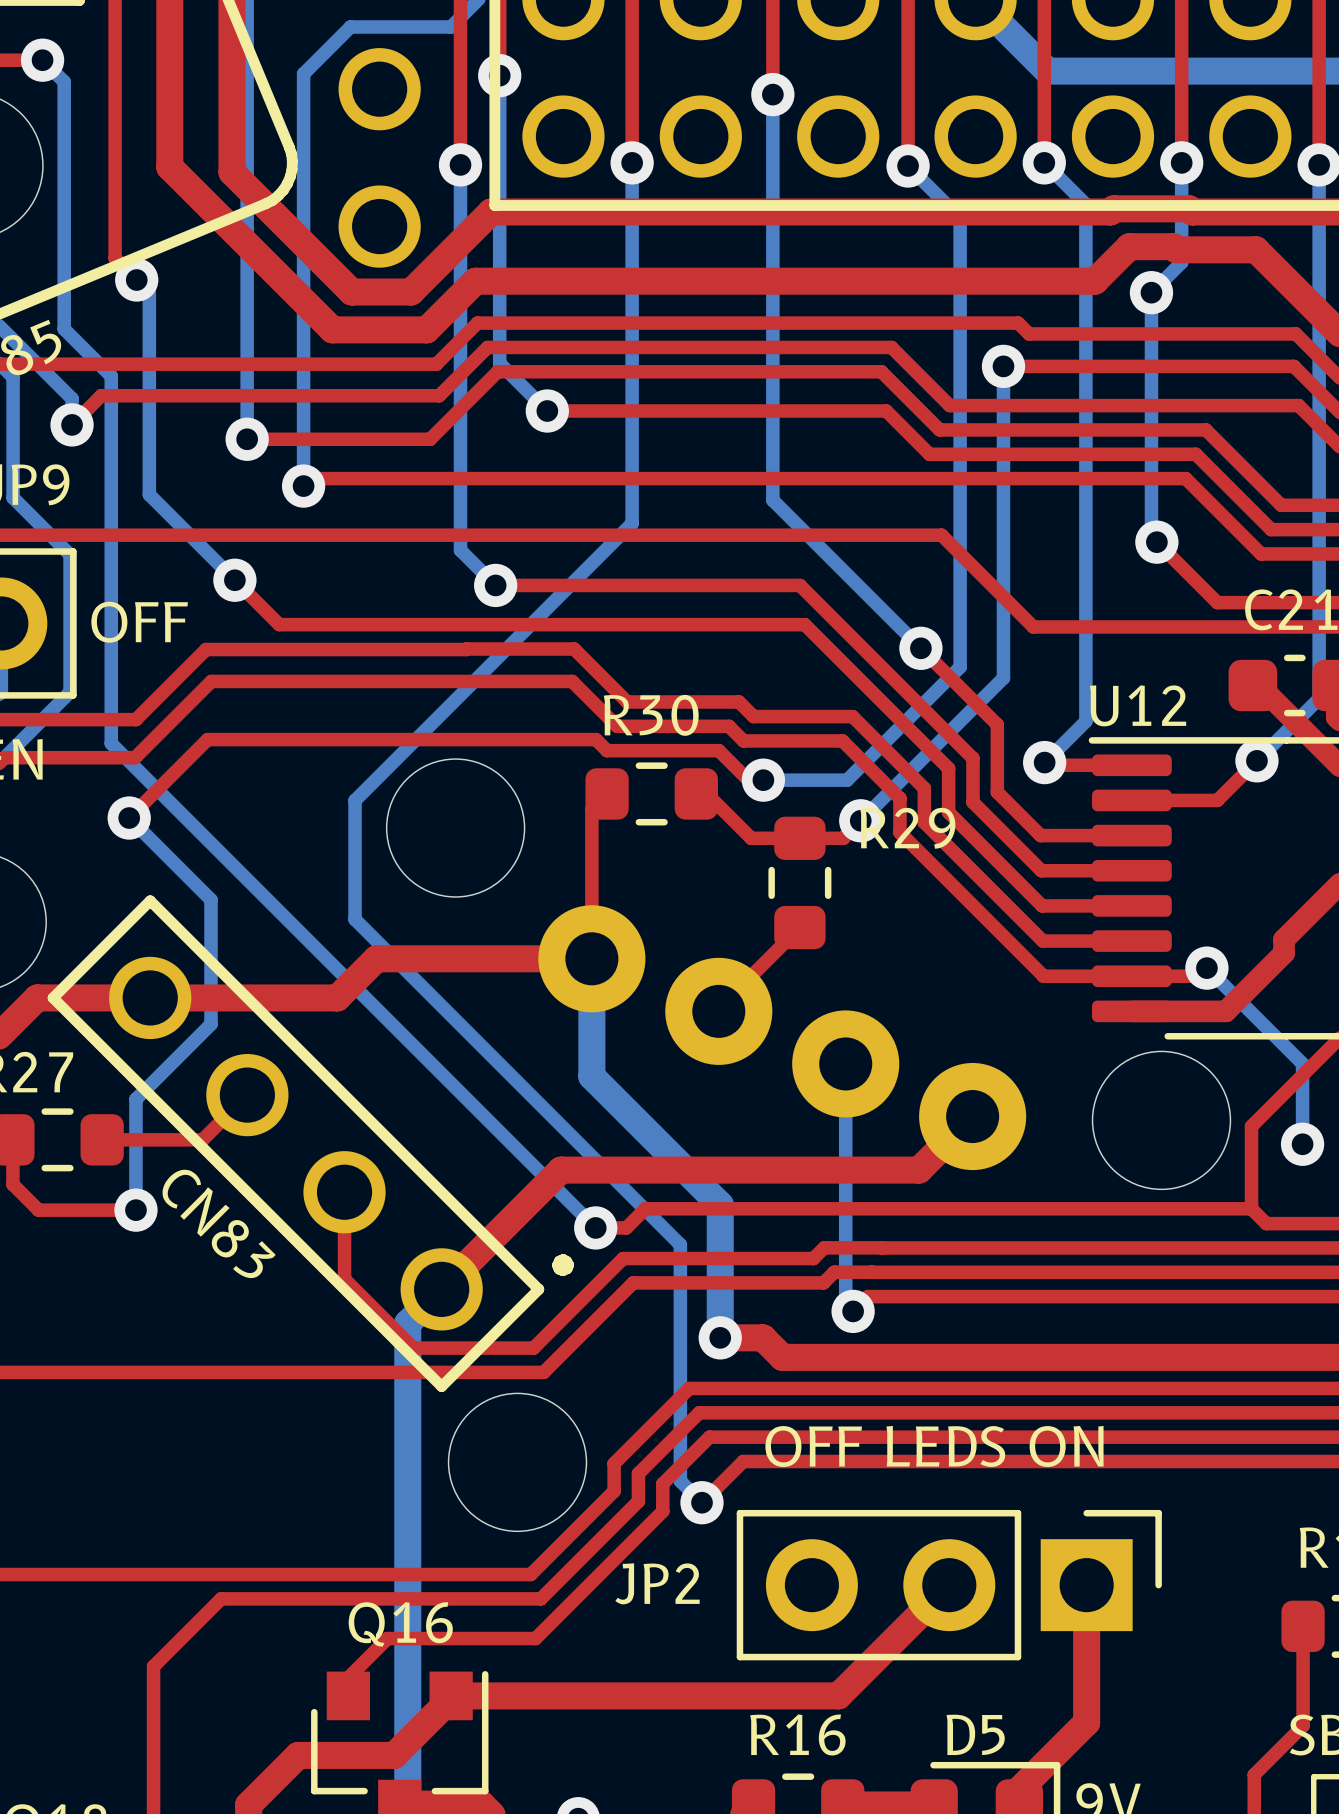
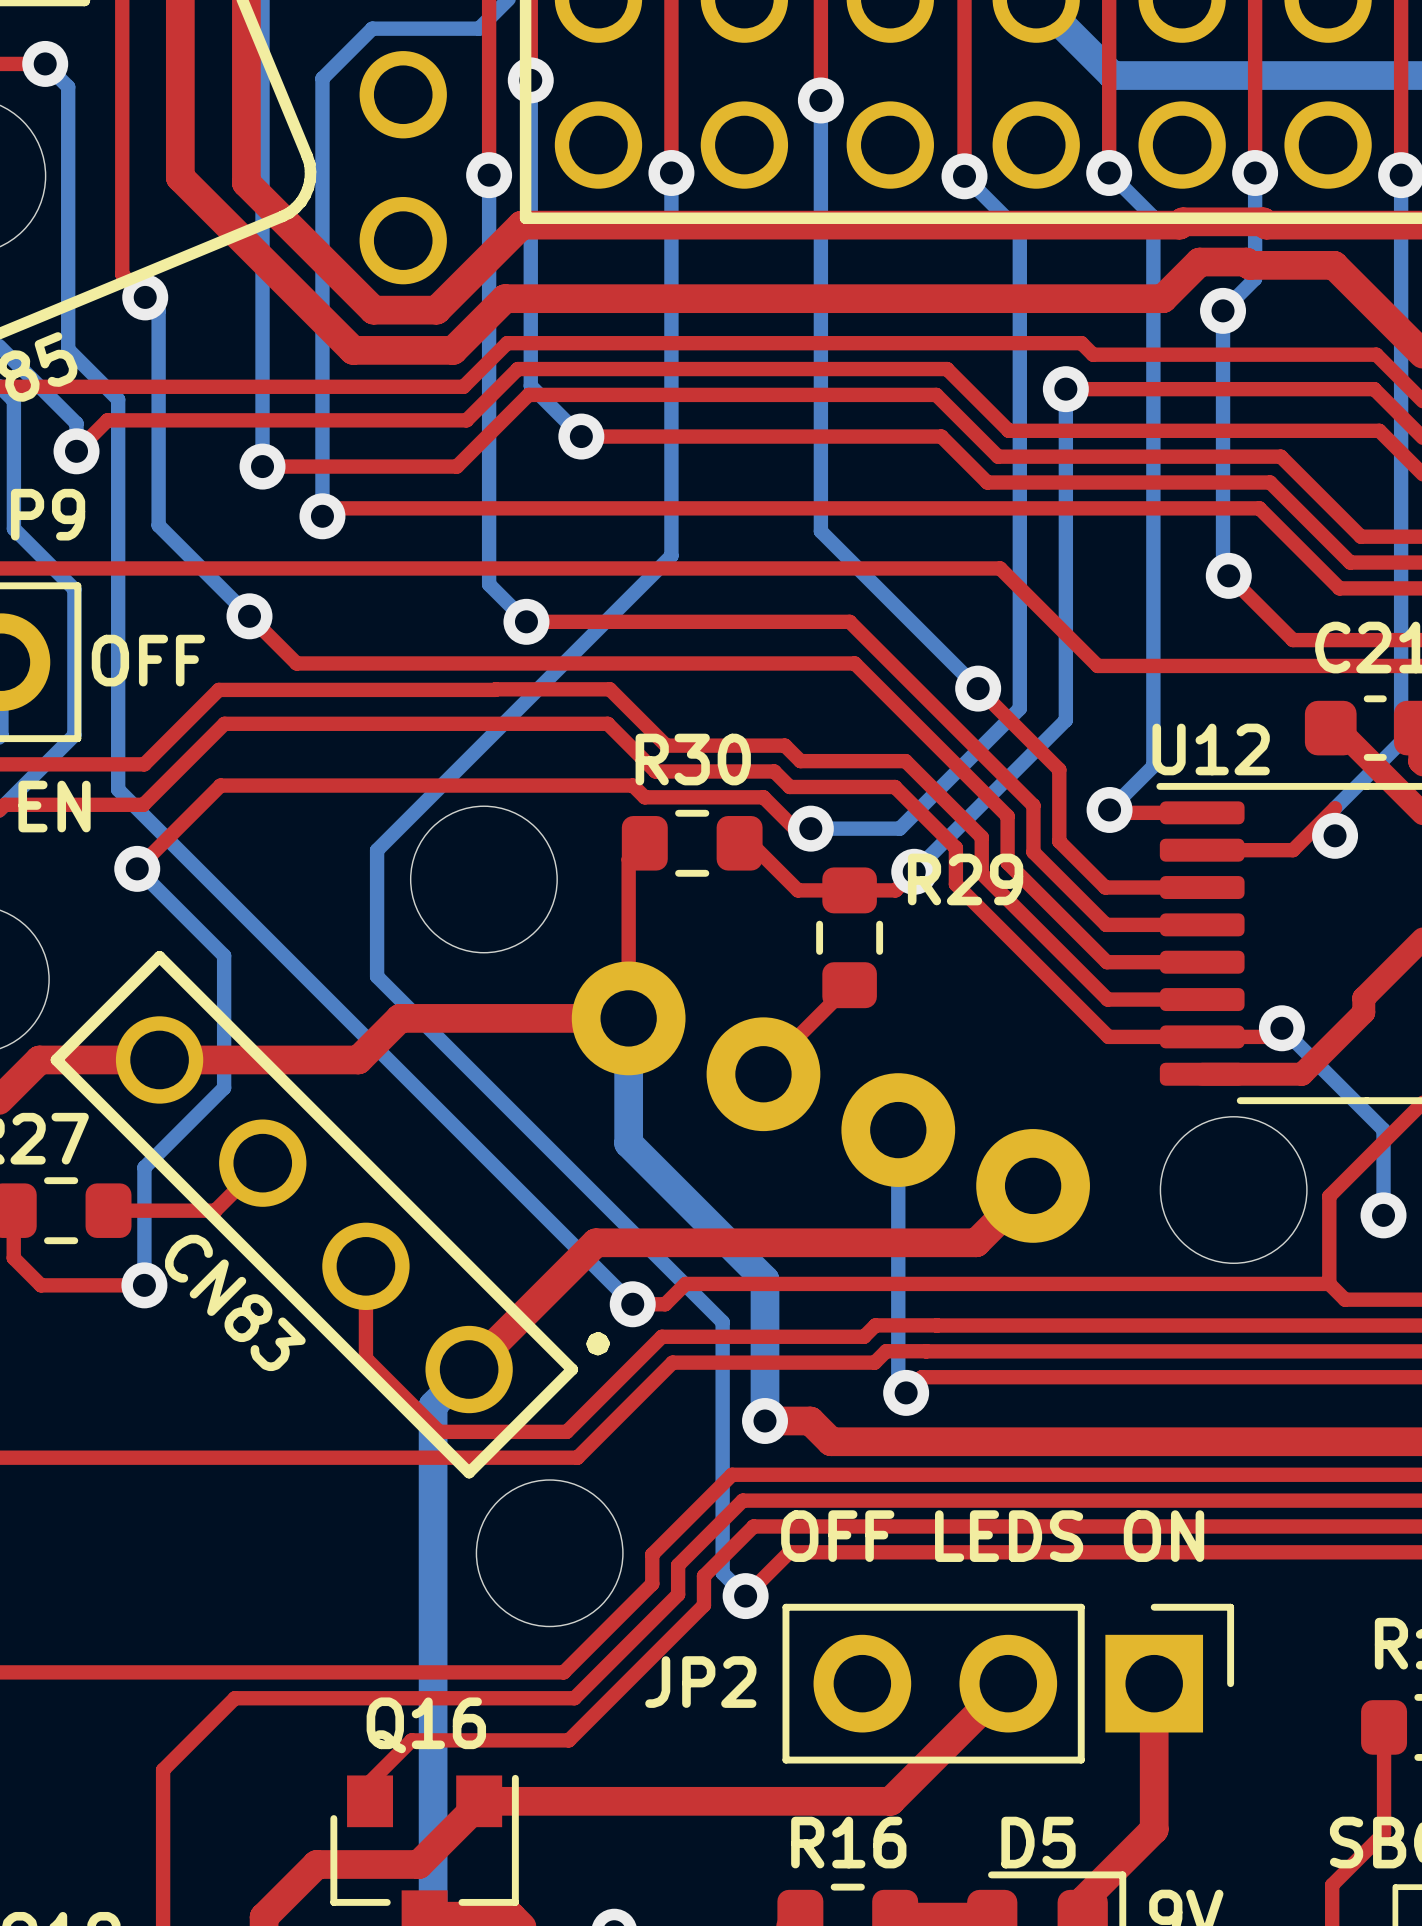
via position: (1256, 760) -> (1335, 835)

